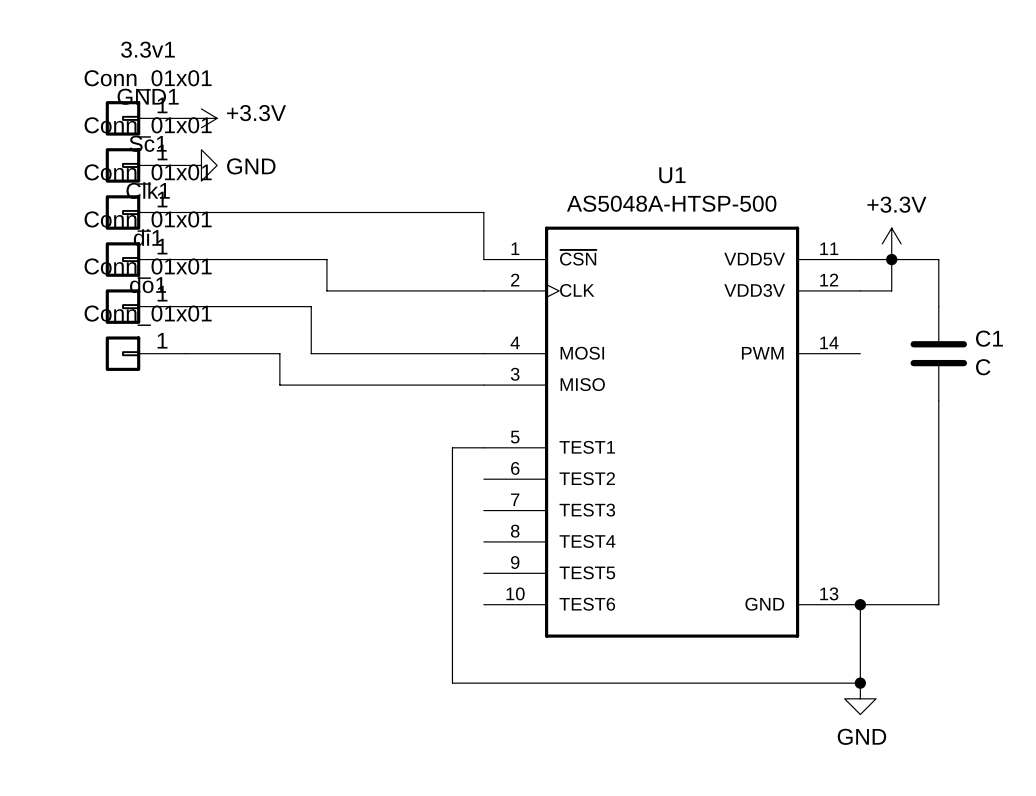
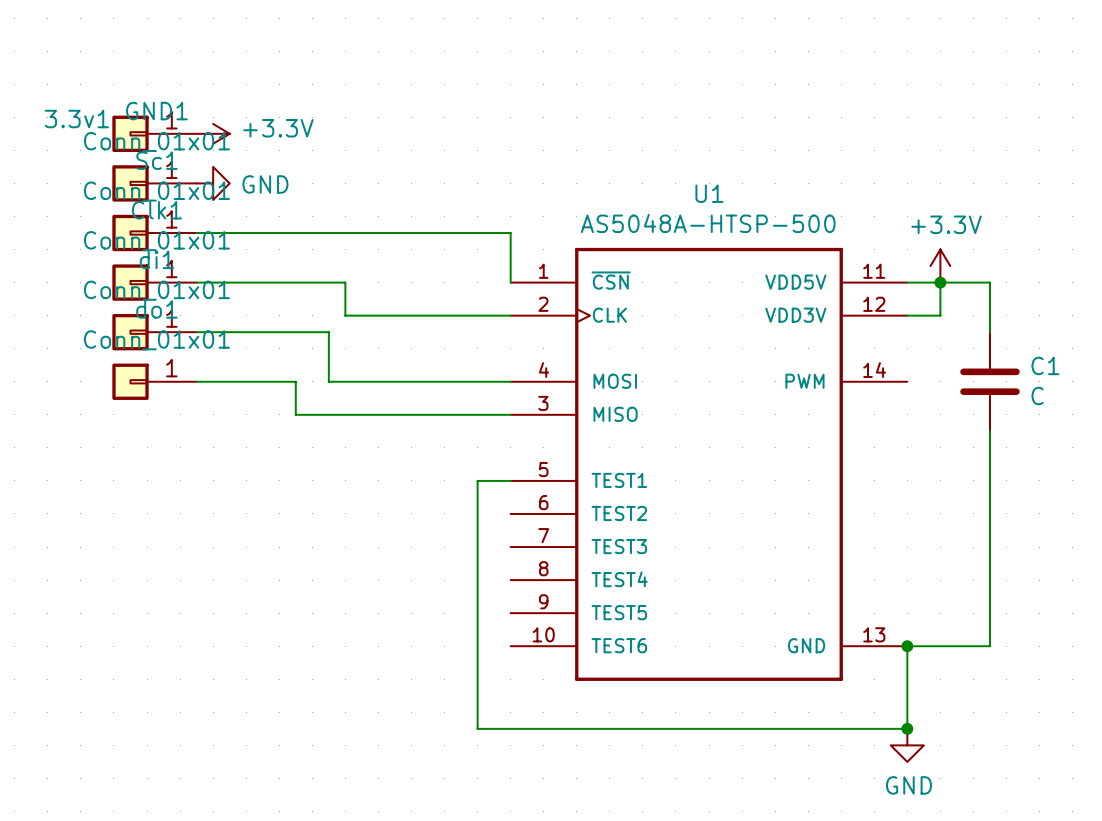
3.3v1 name position: 3.3v1 (147, 49) -> 3.3v1 (76, 119)
3.3v1 value: Conn_01x01 (148, 80) -> none

